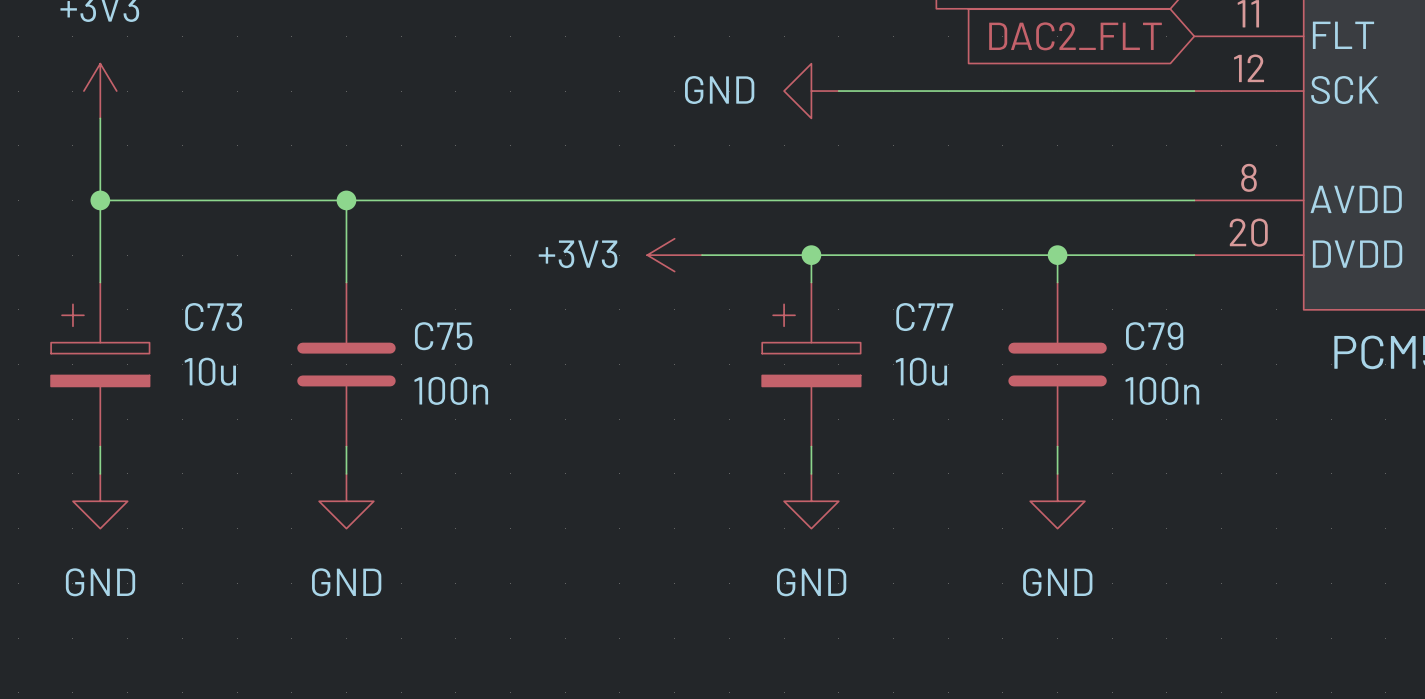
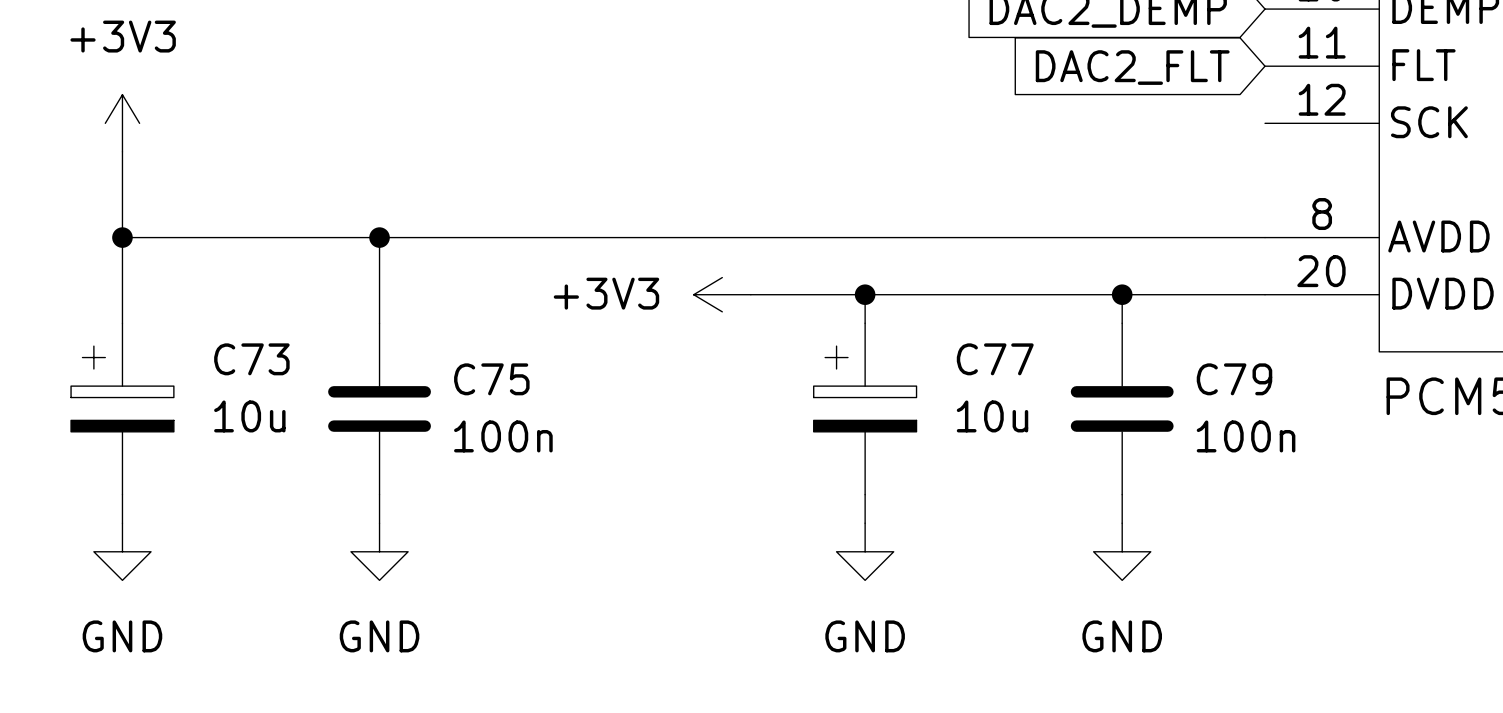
power symbol: GND (811, 91) -> none
wire: (838, 91) (1194, 91) -> none

